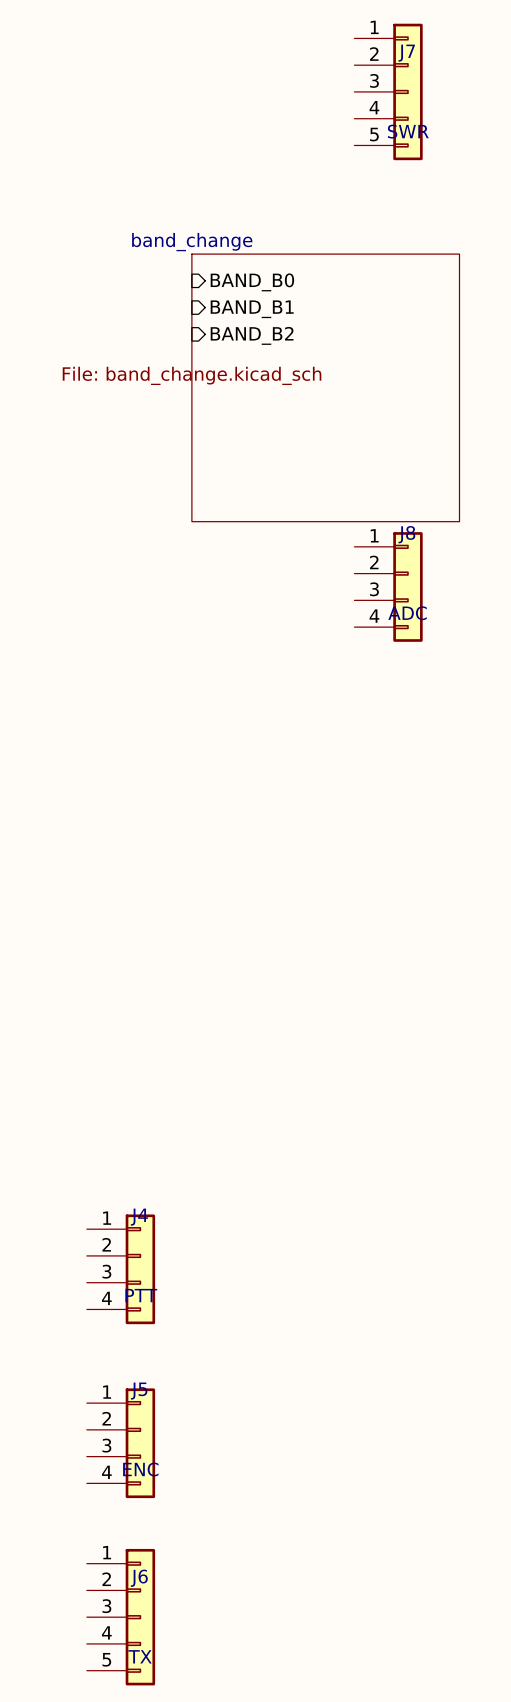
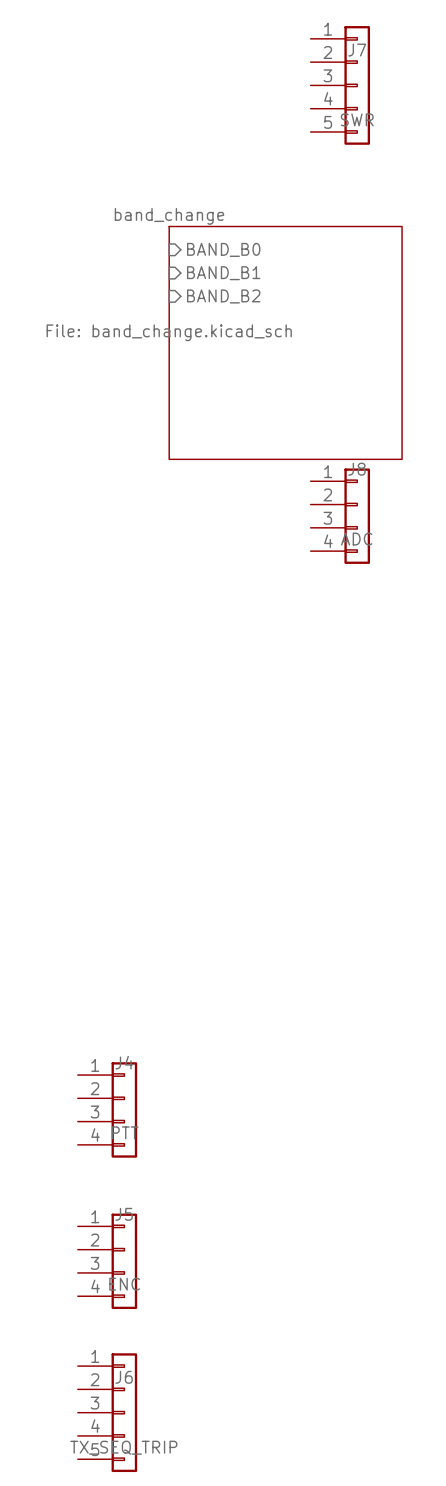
J6 value: TX (140, 1656) -> TX_SEQ_TRIP (123, 1447)

